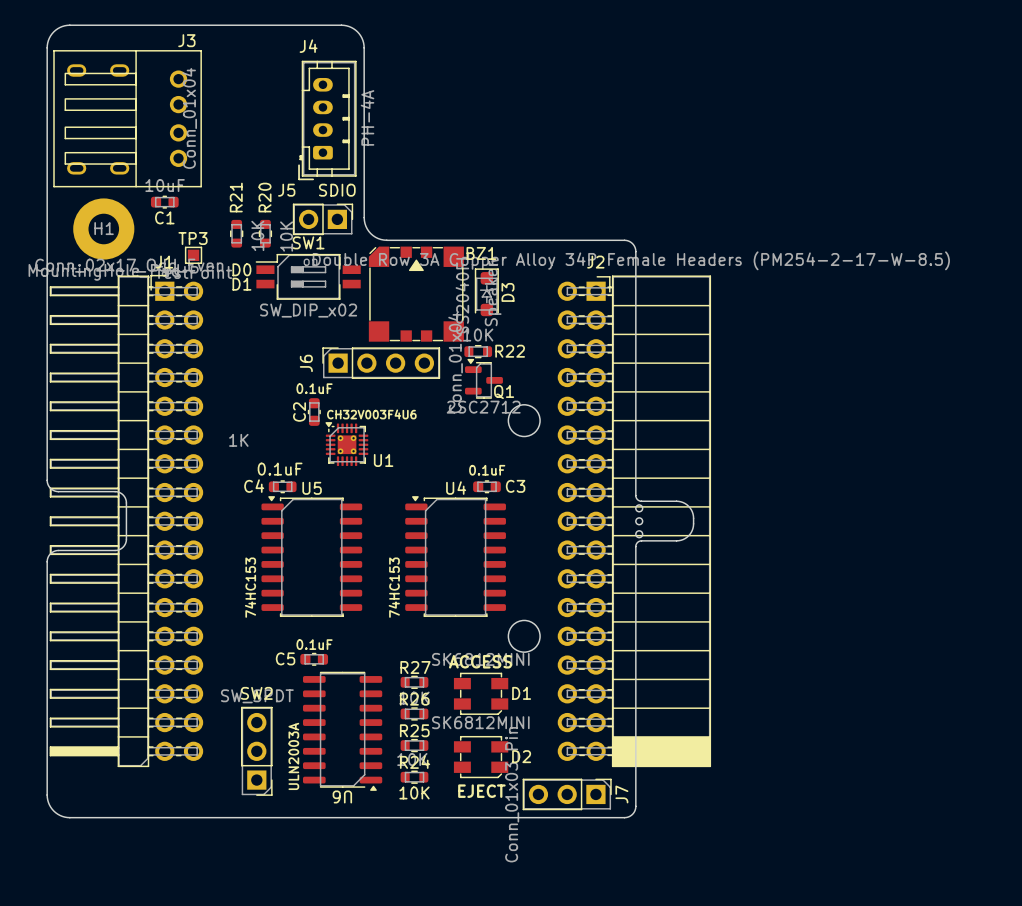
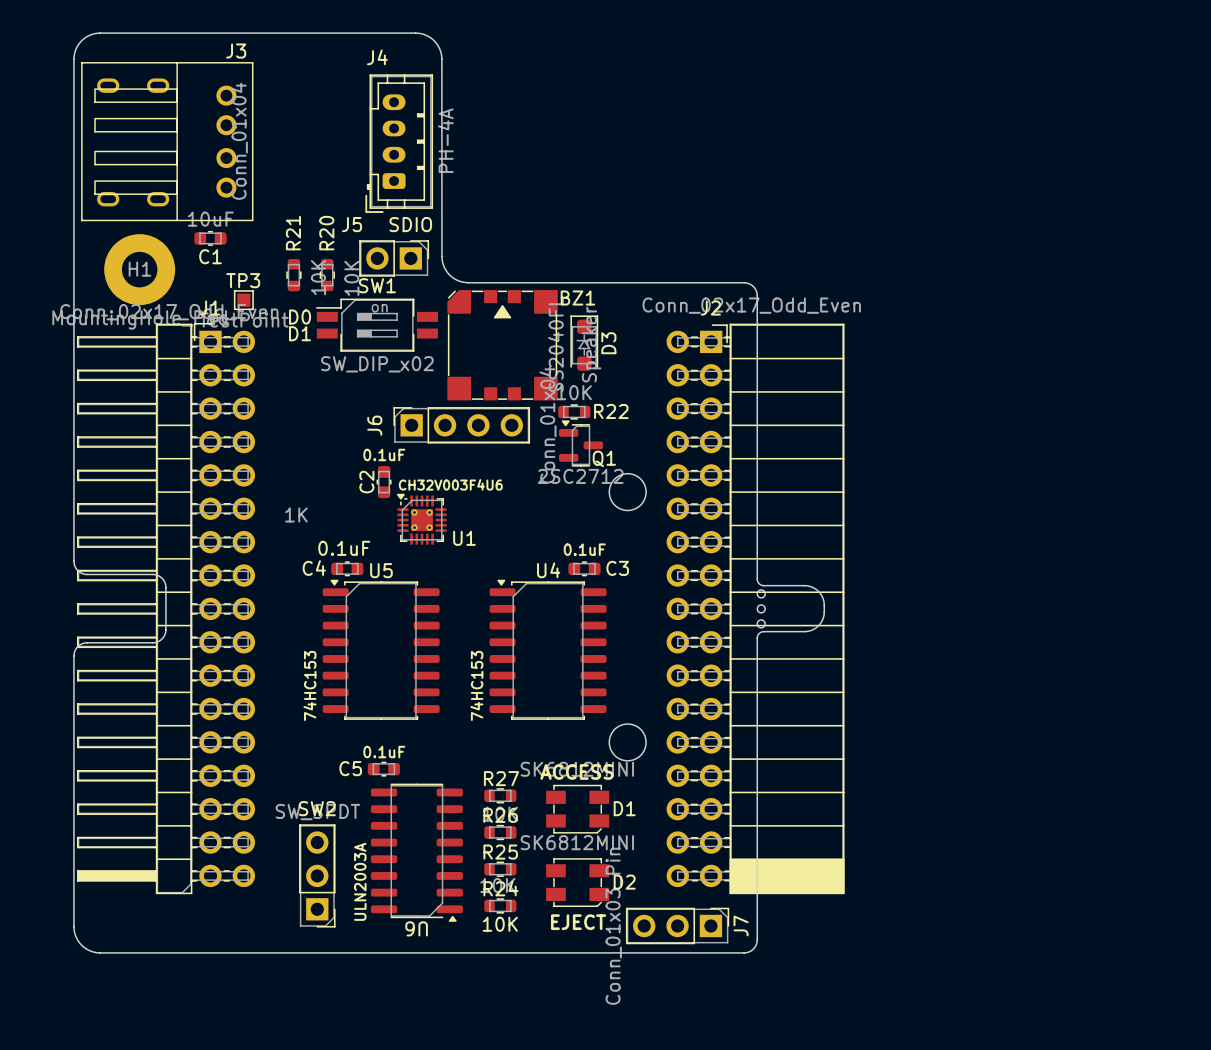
J2 value: Double Row 3A Copper Alloy 34P Female Headers (PM254-2-17-W-8.5) (631, 260) -> Conn_02x17_Odd_Even (751, 305)

